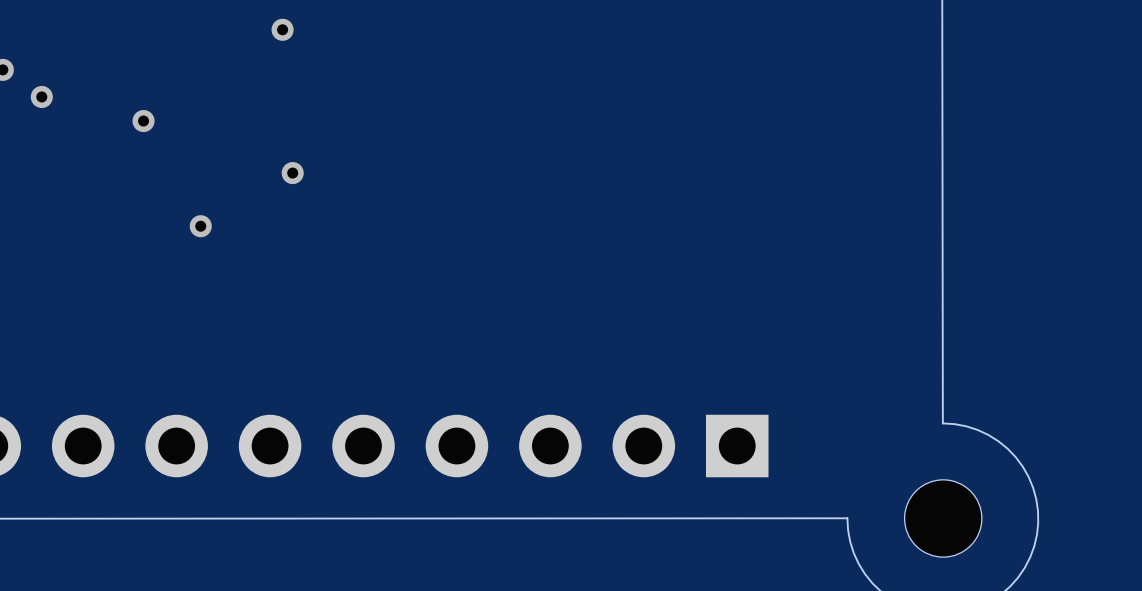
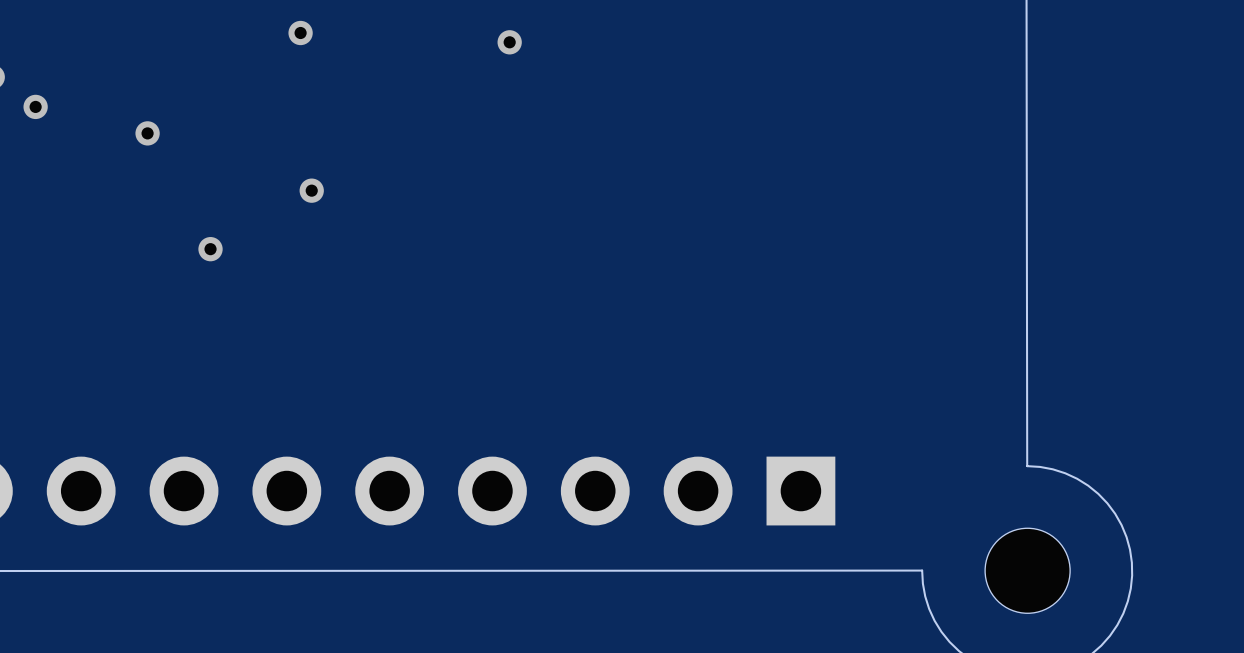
via: none -> (509, 42)

